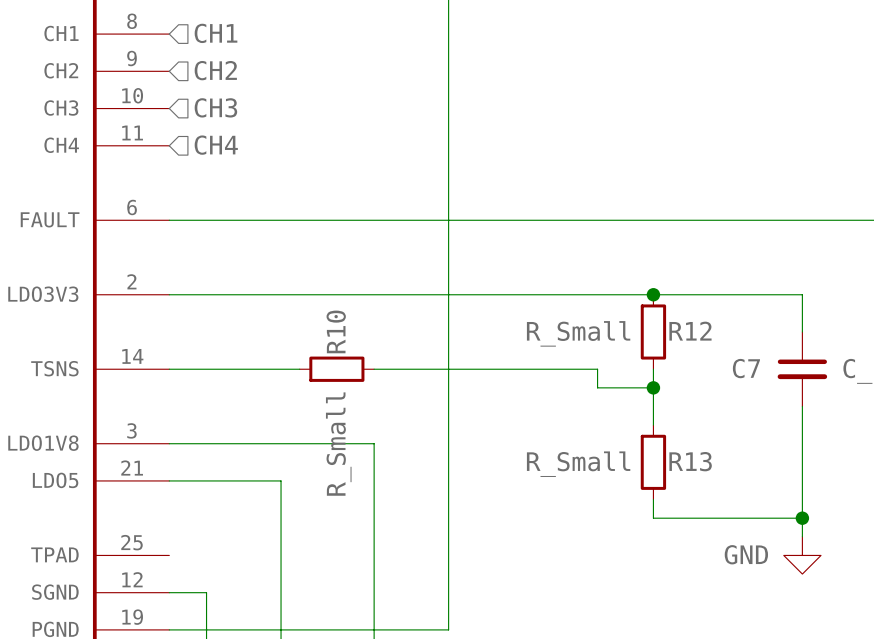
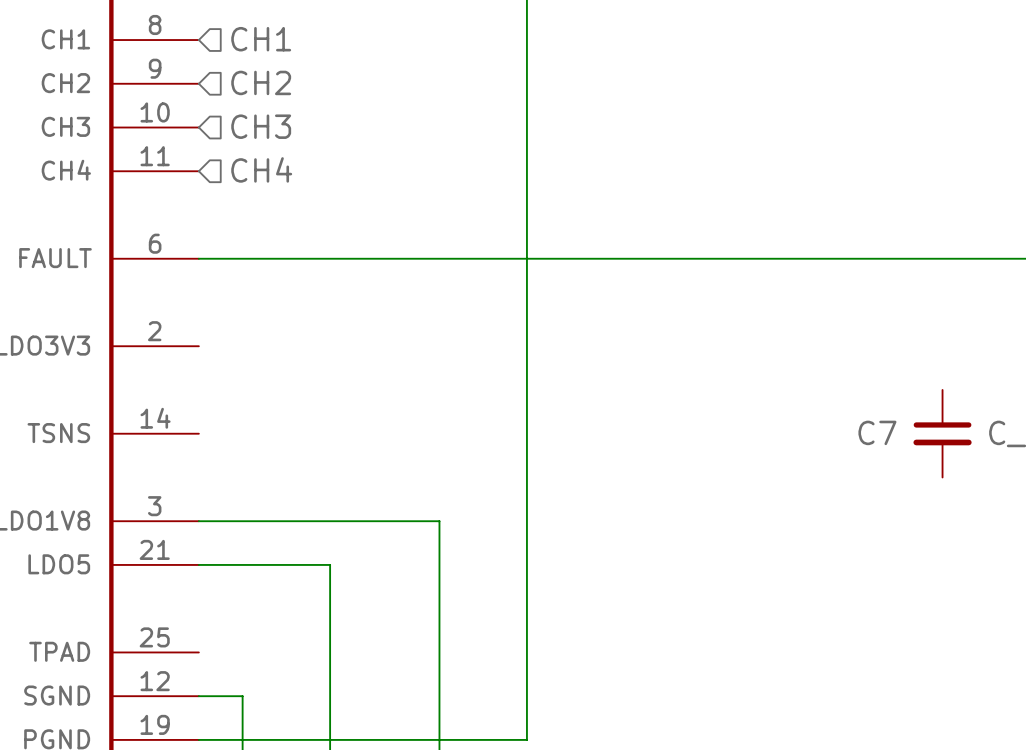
wire: (169, 294) (802, 294) (802, 332) -> none
junction: (653, 294) -> none
R12: R_Small (653, 332) -> none
wire: (169, 369) (299, 369) -> none
R10: R_Small (336, 369) -> none
wire: (374, 369) (597, 369) (597, 387) (653, 387) -> none
wire: (653, 369) (653, 425) -> none
junction: (653, 387) -> none
wire: (802, 406) (802, 536) -> none
R13: R_Small (653, 462) -> none
wire: (653, 499) (653, 518) (802, 518) -> none
junction: (802, 518) -> none
power symbol: GND (802, 555) -> none

